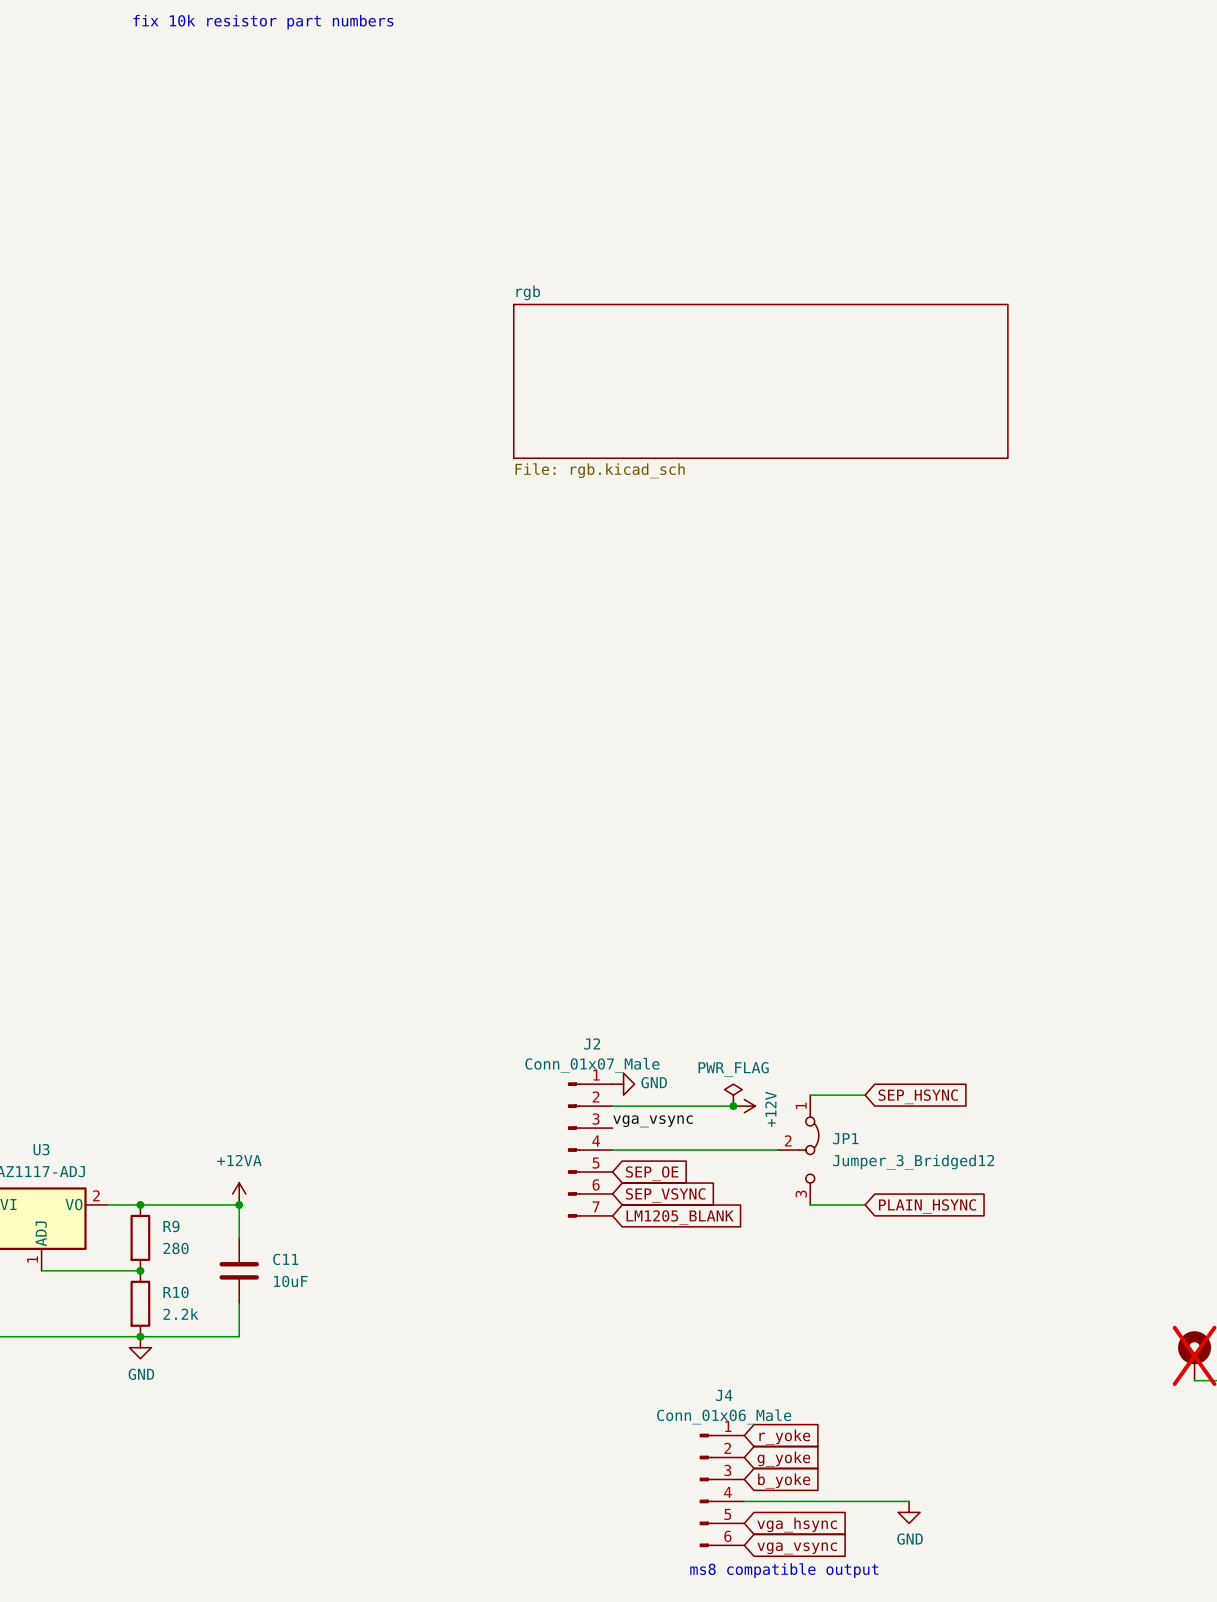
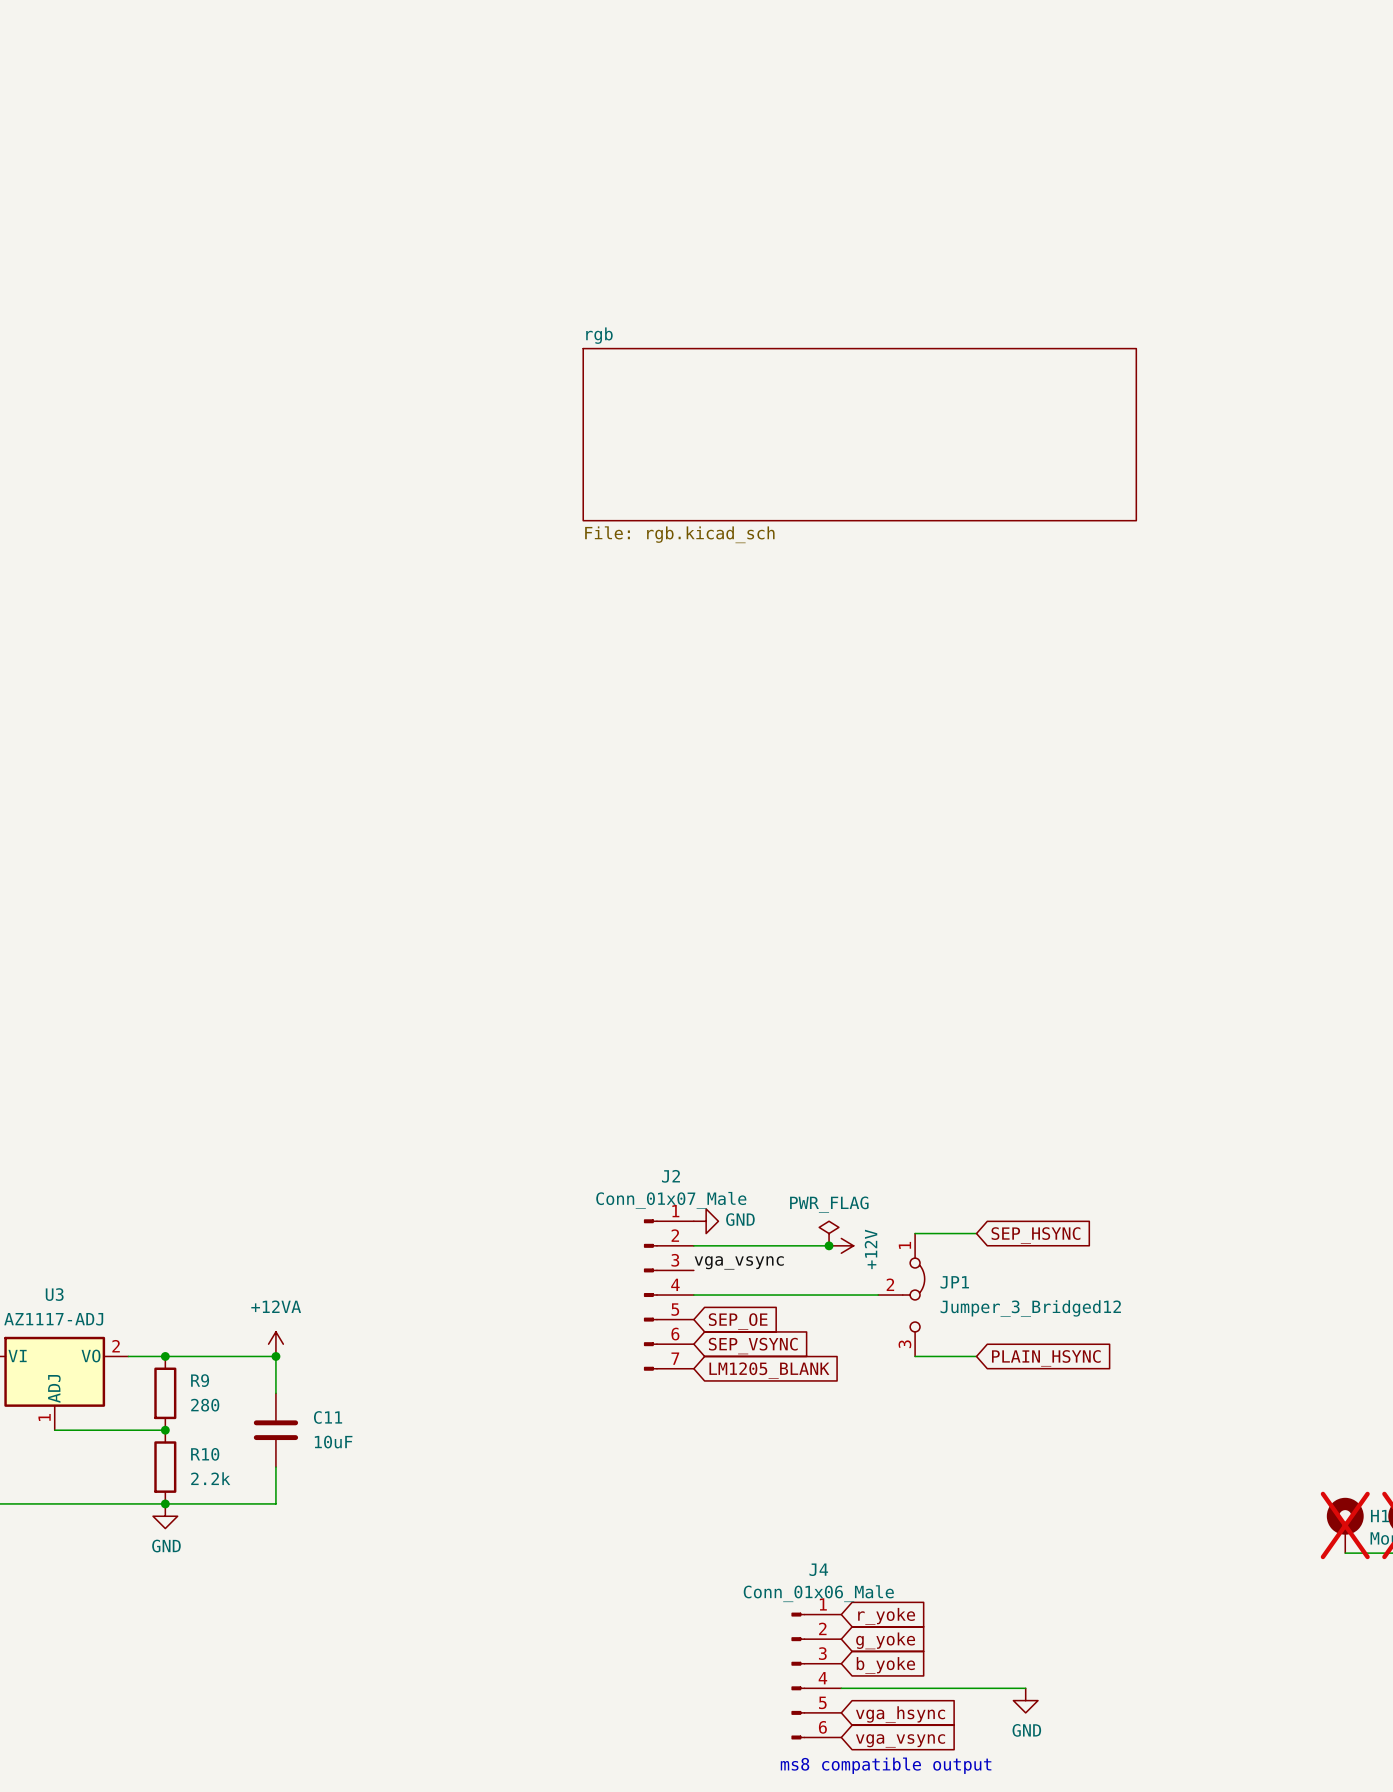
text: fix 10k resistor part numbers (263, 22) -> none

